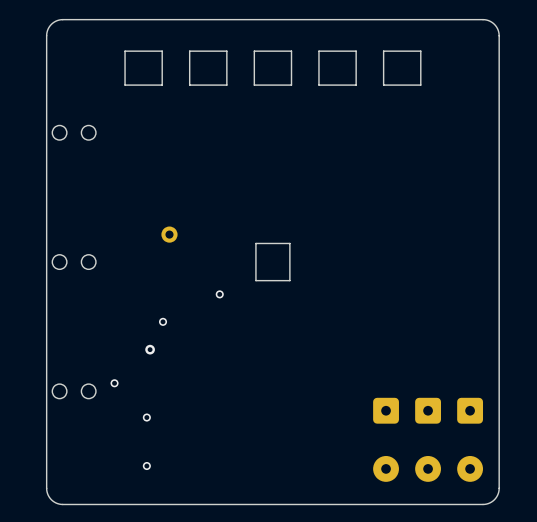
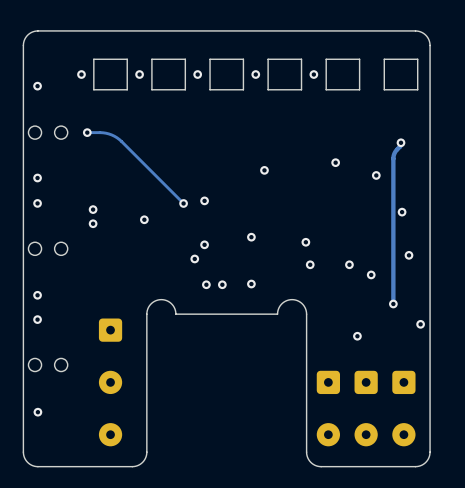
via: none -> (81, 74)
via: none -> (139, 74)
via: none -> (197, 74)
via: none -> (255, 74)
via: none -> (313, 74)
via: none -> (37, 86)
track: none -> (87, 132) (105, 133) (117, 137) (183, 203)
via: none -> (87, 132)
track: none -> (400, 142) (393, 158) (393, 303)
via: none -> (400, 142)
via: none -> (335, 162)
via: none -> (264, 170)
via: none -> (376, 175)
via: none -> (37, 178)
via: none -> (204, 200)
via: none -> (37, 203)
via: none -> (183, 203)
via: none -> (93, 209)
via: none -> (402, 212)
via: none -> (144, 219)
via: none -> (93, 223)
part: (169, 234) -> none
via: none -> (251, 237)
via: none -> (305, 242)
via: none -> (204, 244)
part rotation: 0° (272, 262) -> 90° clockwise (400, 74)
part position: (272, 262) -> (400, 74)
via: none -> (408, 255)
via: none -> (194, 258)
via: none -> (310, 264)
via: none -> (349, 264)
via: none -> (371, 274)
via: (219, 294) -> none
via: none -> (251, 284)
via: none -> (206, 284)
via: none -> (222, 284)
via: none -> (37, 295)
via: (163, 321) -> none
via: none -> (393, 303)
via: none -> (37, 319)
via: none -> (420, 324)
via: (150, 349) -> none
via: none -> (357, 336)
via: (114, 383) -> none
part: none -> (110, 382)
via: (146, 417) -> none
via: none -> (37, 412)
via: (146, 466) -> none
board edge: (377, 504) (167, 504) -> (321, 466) (310, 462) (306, 453) (306, 312) (301, 303) (292, 299) (281, 304) (277, 314) (175, 314) (173, 305) (166, 300) (157, 300) (150, 304) (146, 314) (146, 453) (142, 462) (132, 466)

